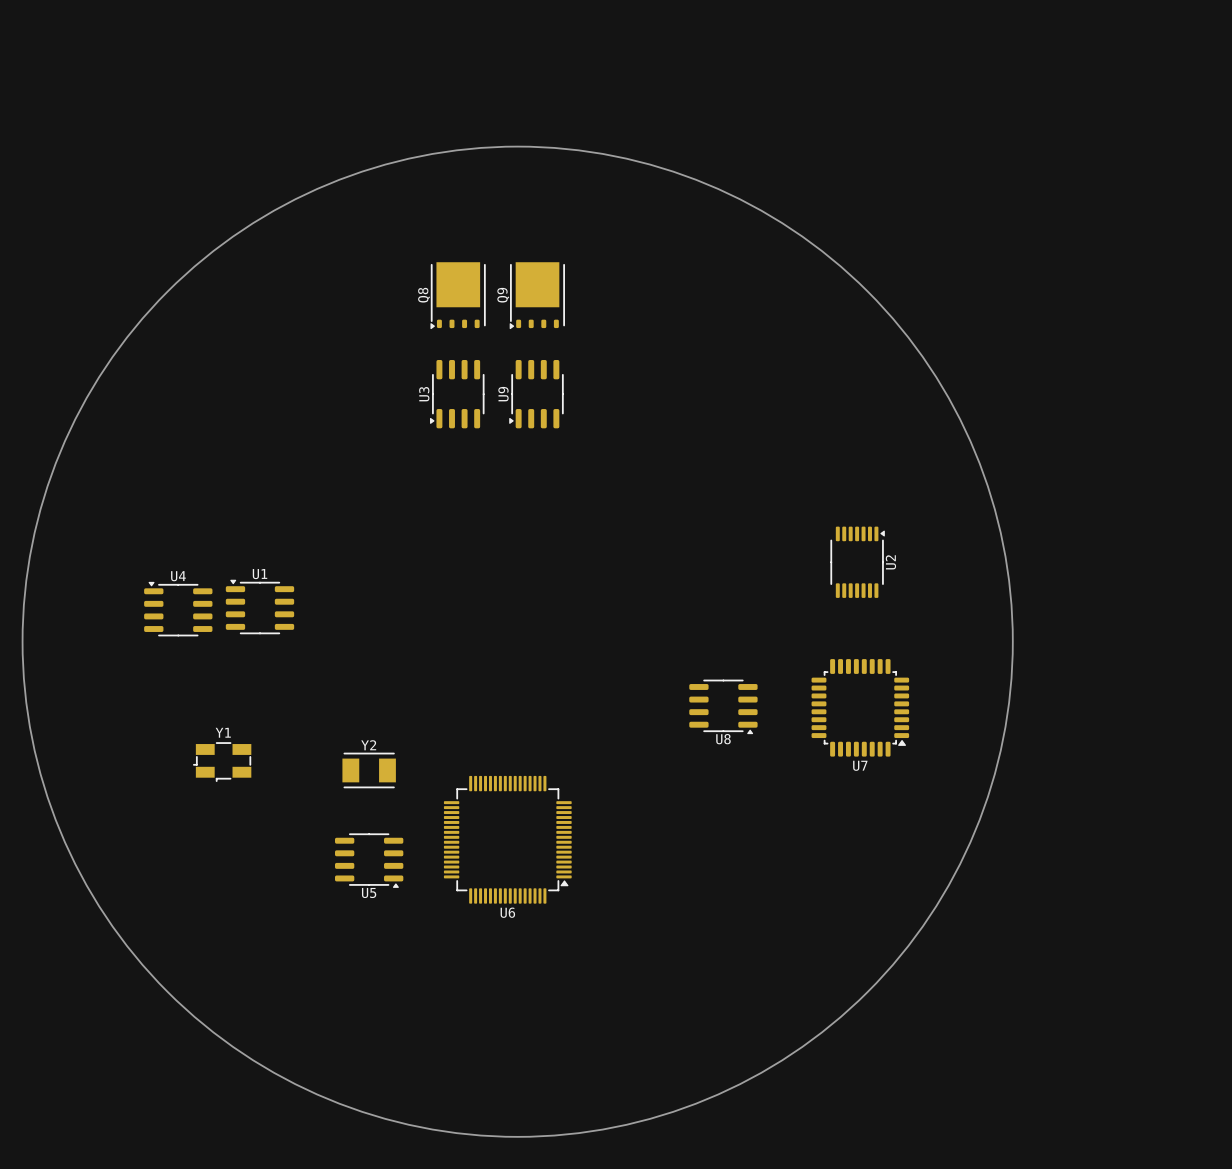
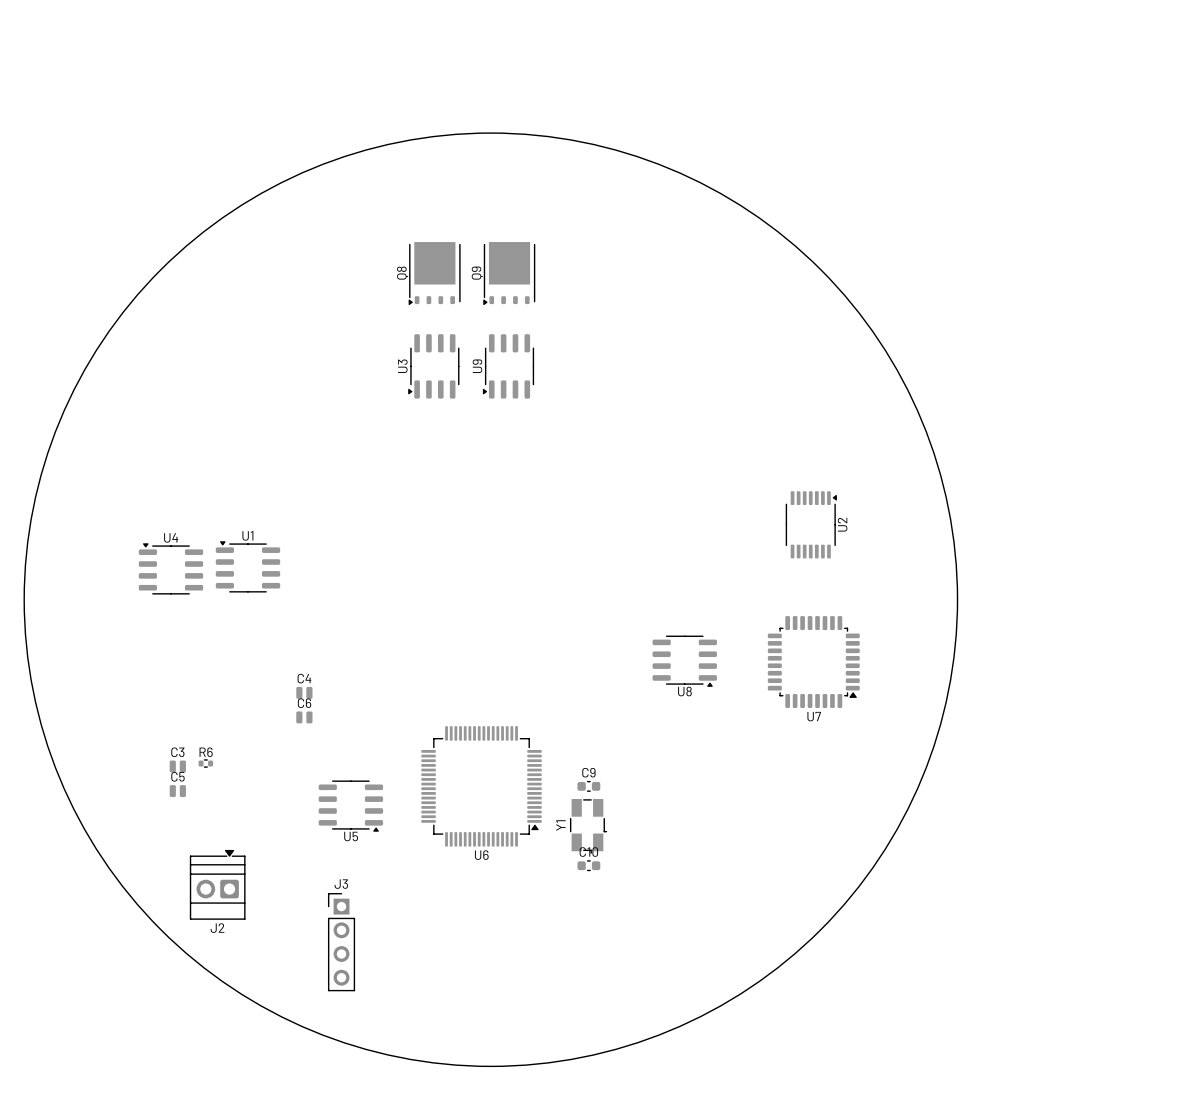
C4: none -> (304, 692)
Y1 rotation: 0° (222, 762) -> 90° counterclockwise (588, 826)
Y1 position: (222, 762) -> (588, 826)
C6: none -> (304, 717)
Y2: (369, 770) -> none
R6: none -> (205, 763)
C3: none -> (177, 766)
C9: none -> (588, 786)
C5: none -> (177, 791)
C10: none -> (588, 865)
J2: none -> (217, 884)
J3: none -> (341, 942)

